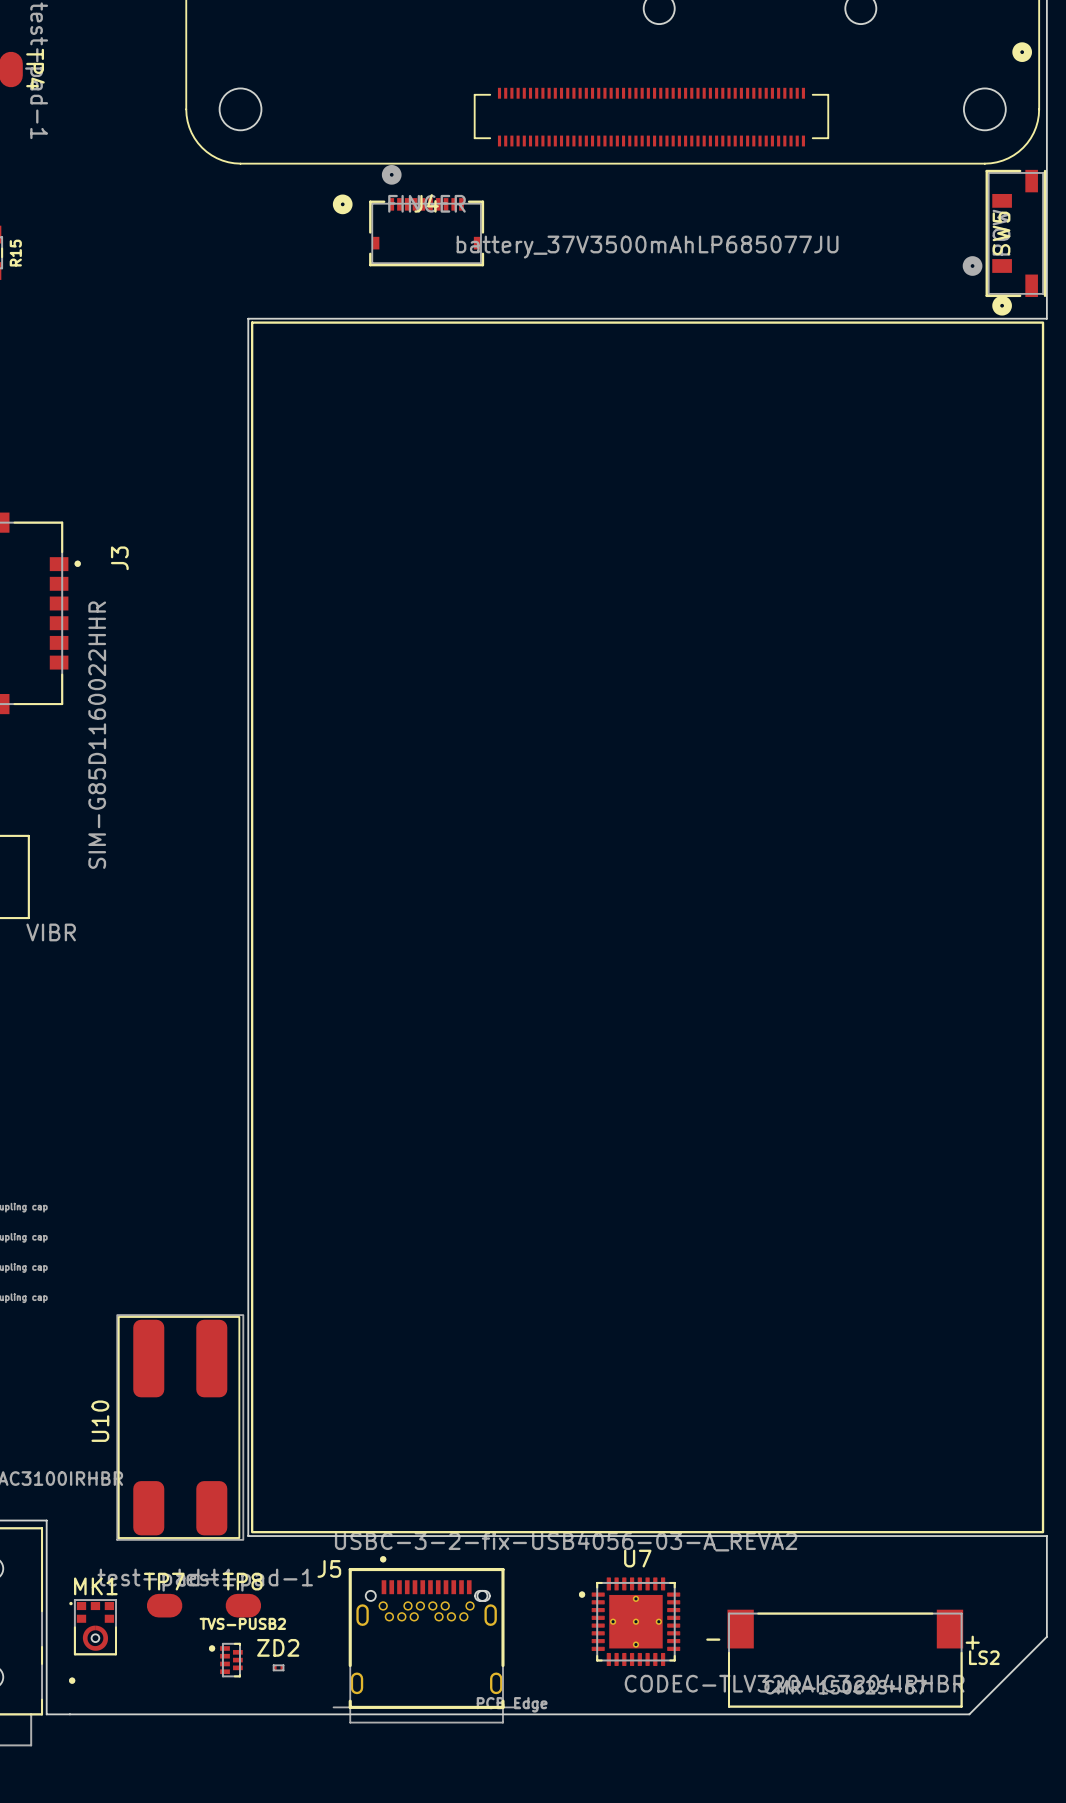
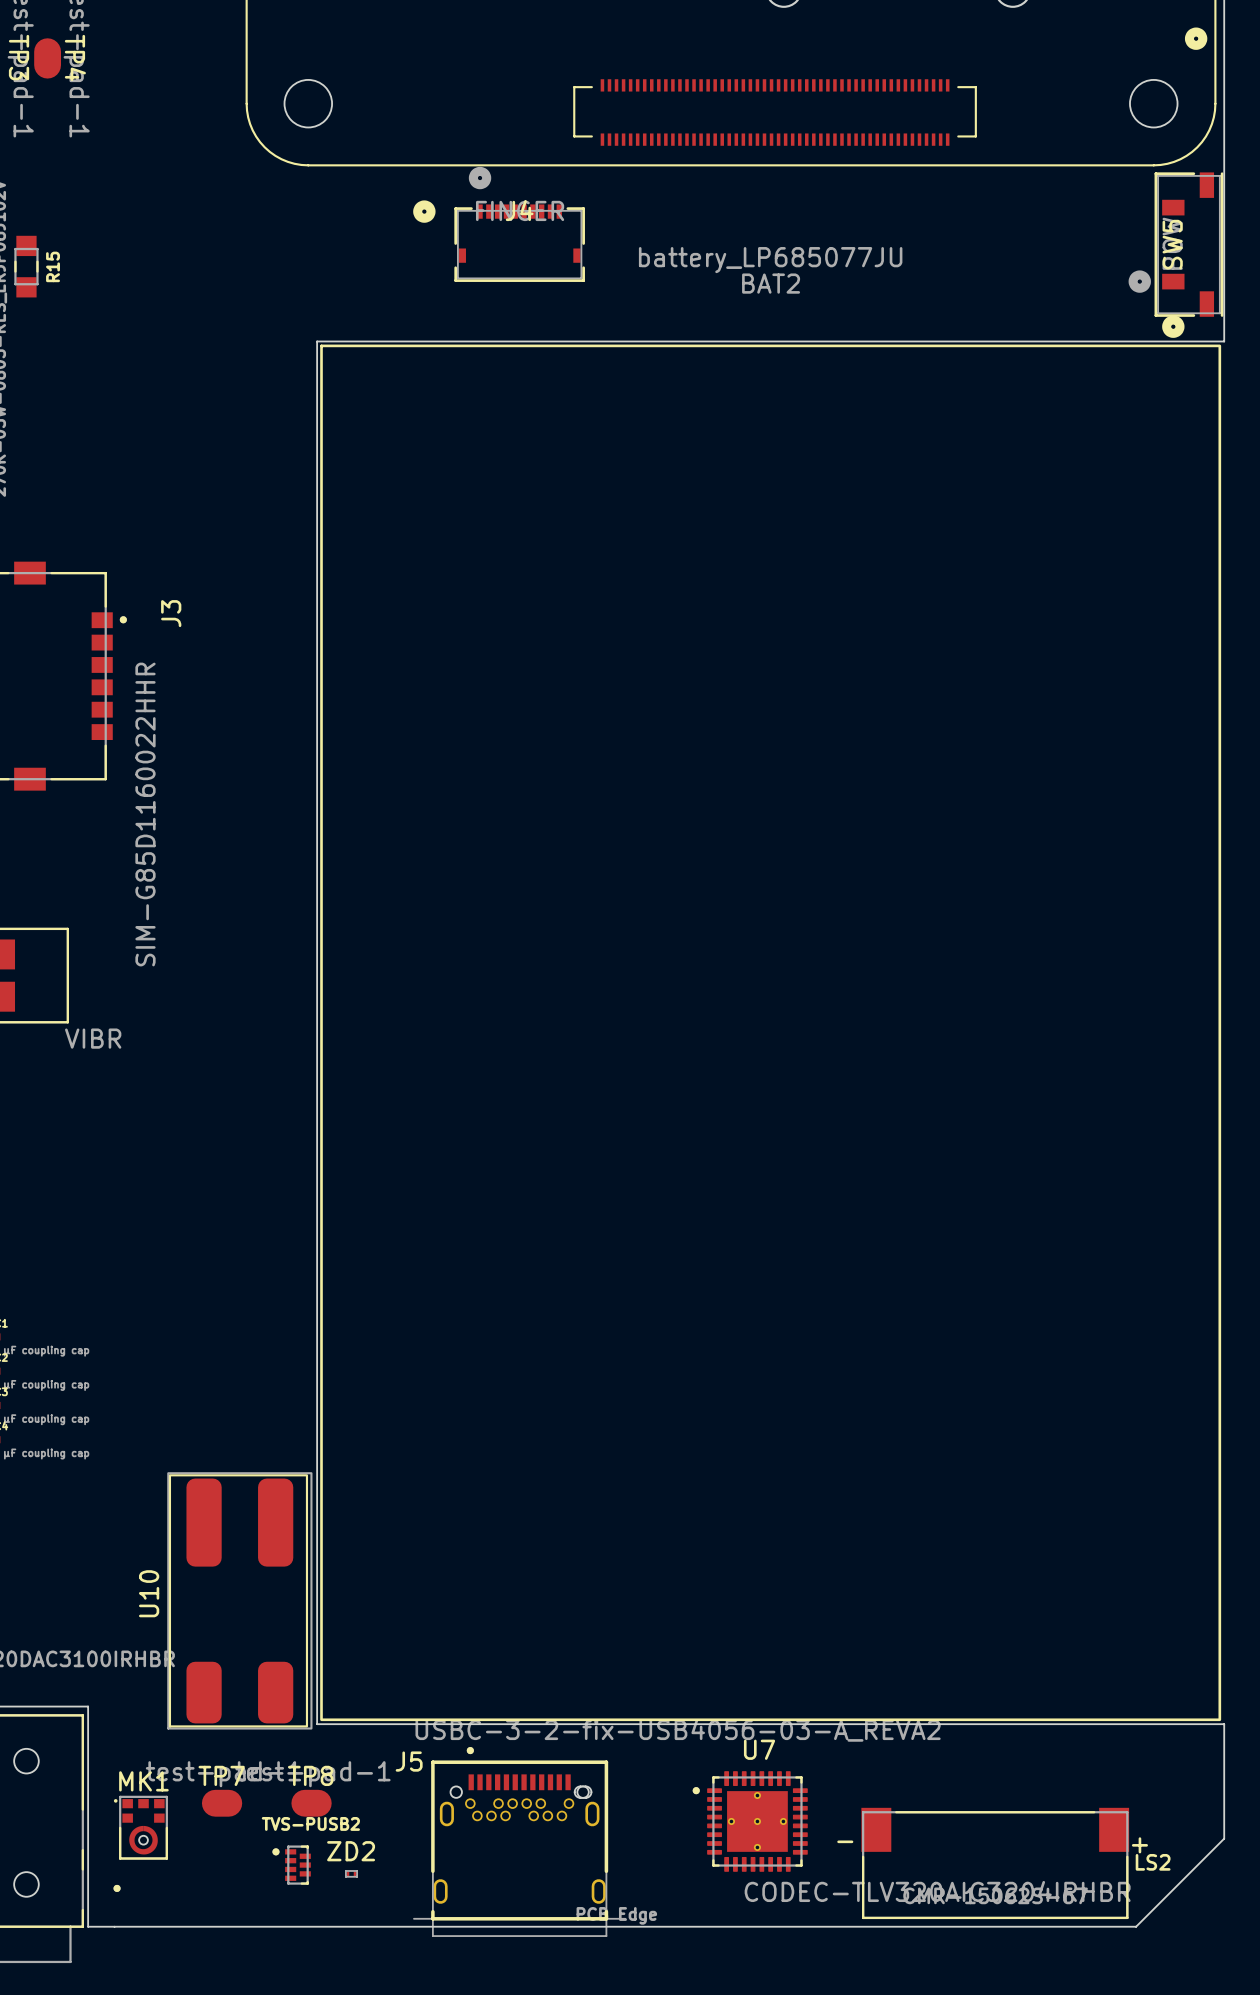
drawing: [250, 321, 1045, 1534] -> none
BAT2: none -> battery_LP685077JU (770, 1032)

